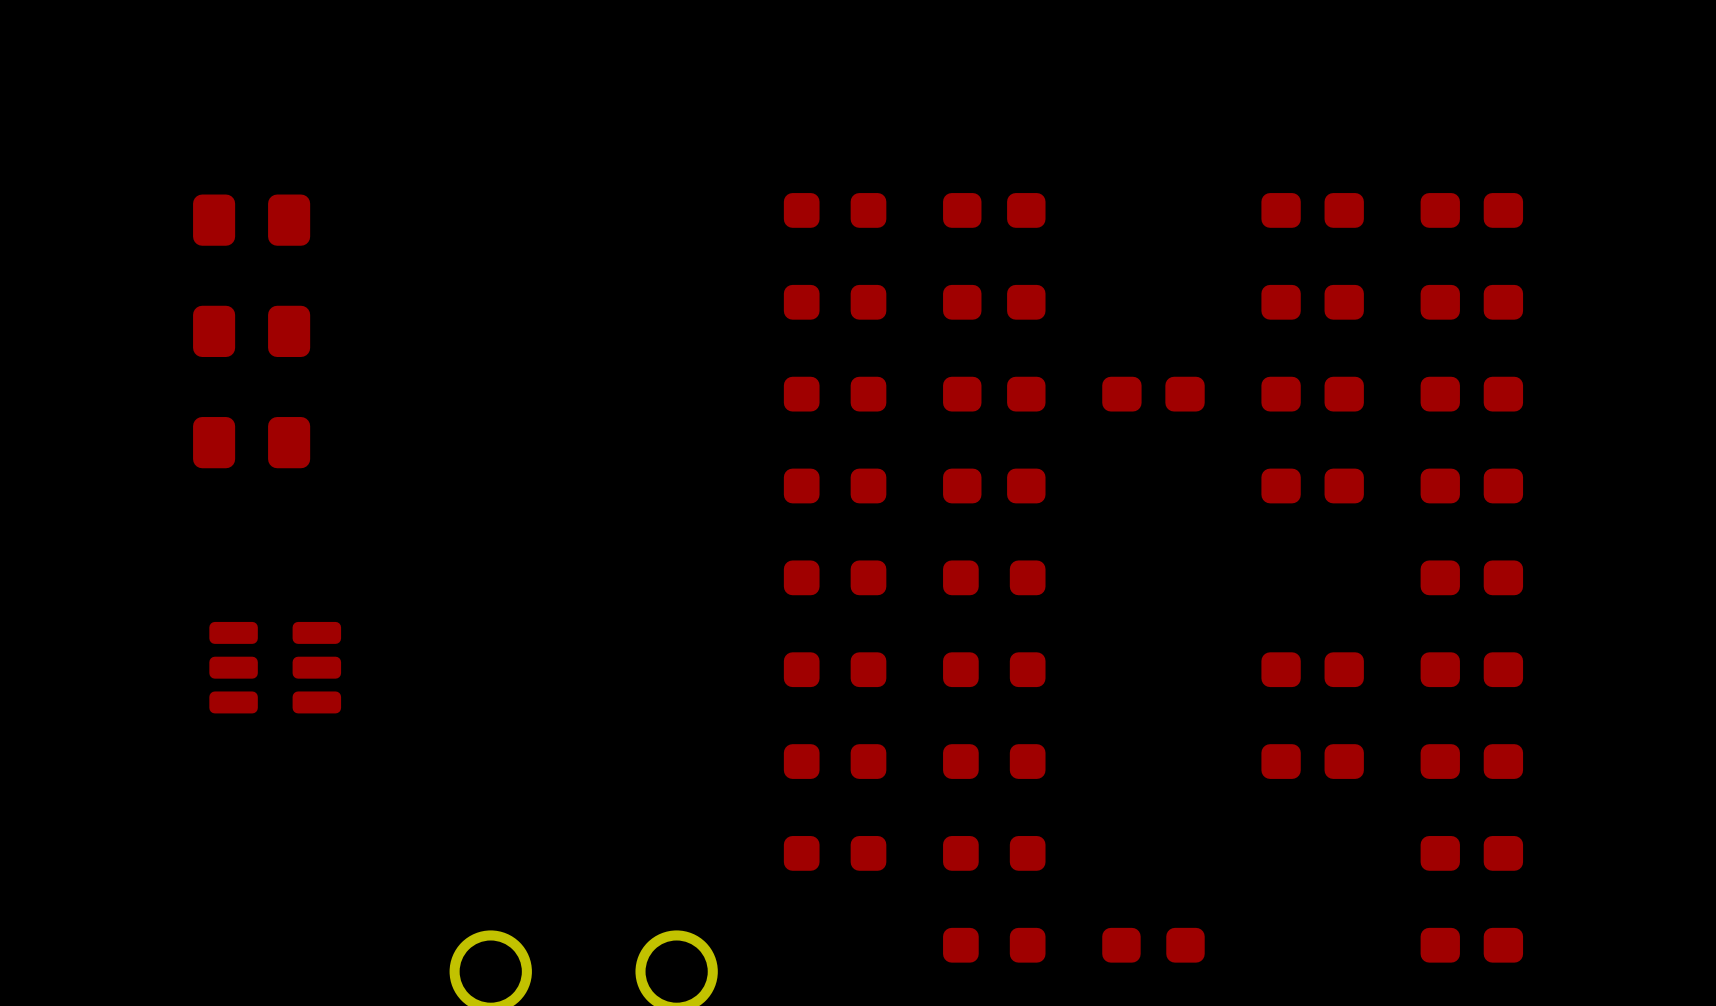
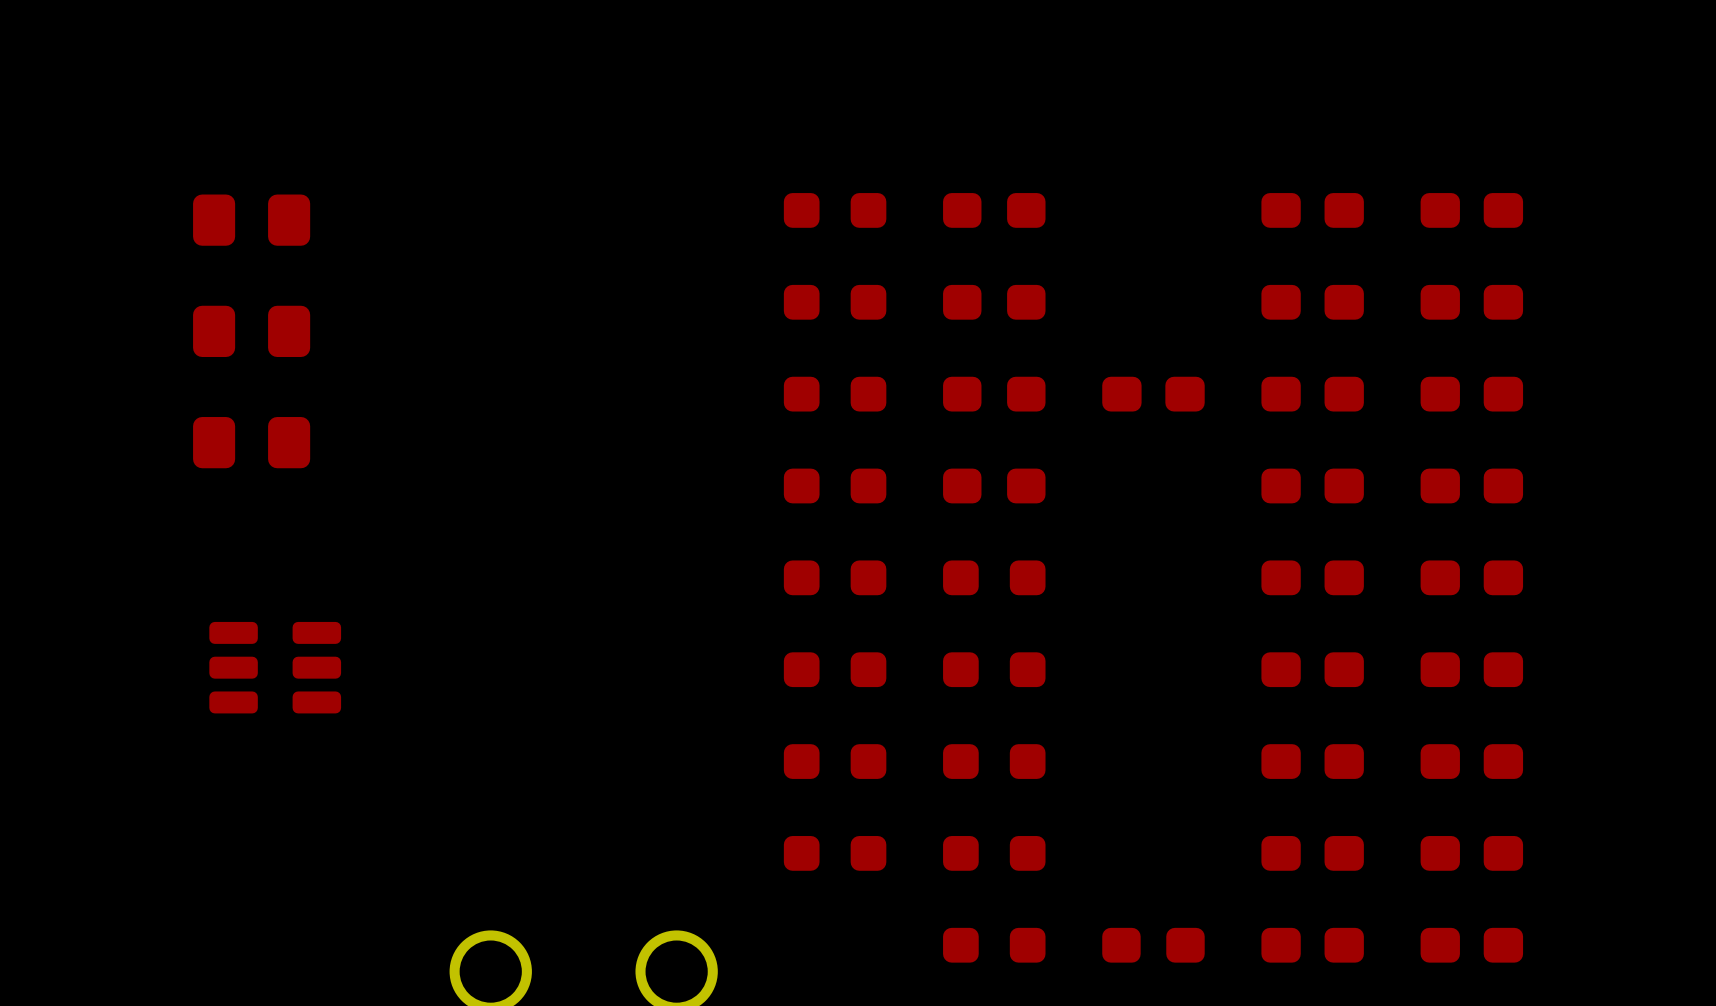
part: none -> (1312, 577)
part: none -> (1312, 853)
part: none -> (1312, 945)

